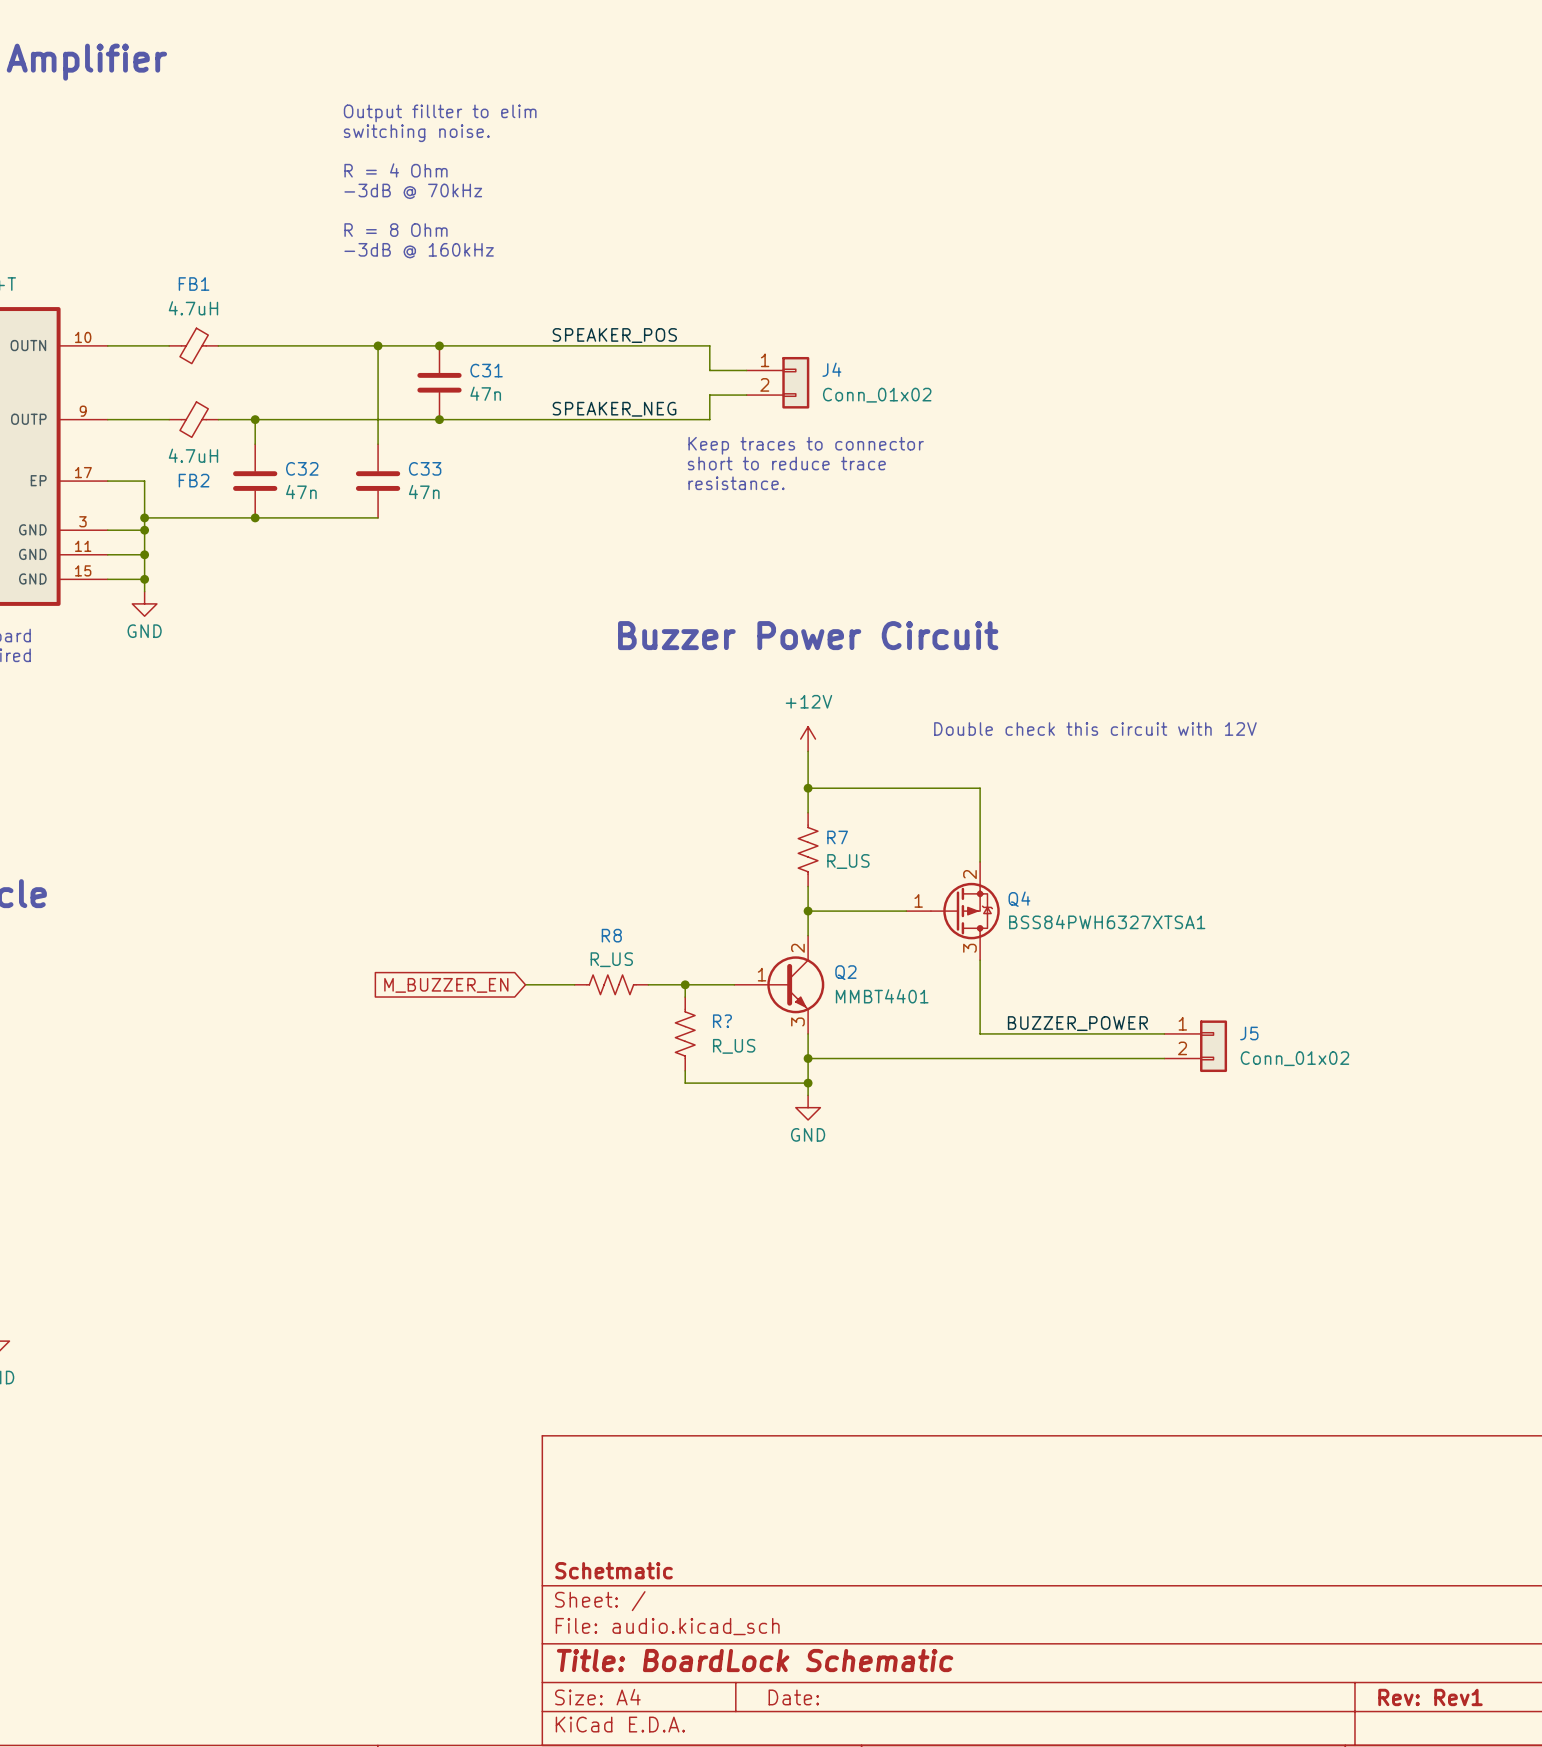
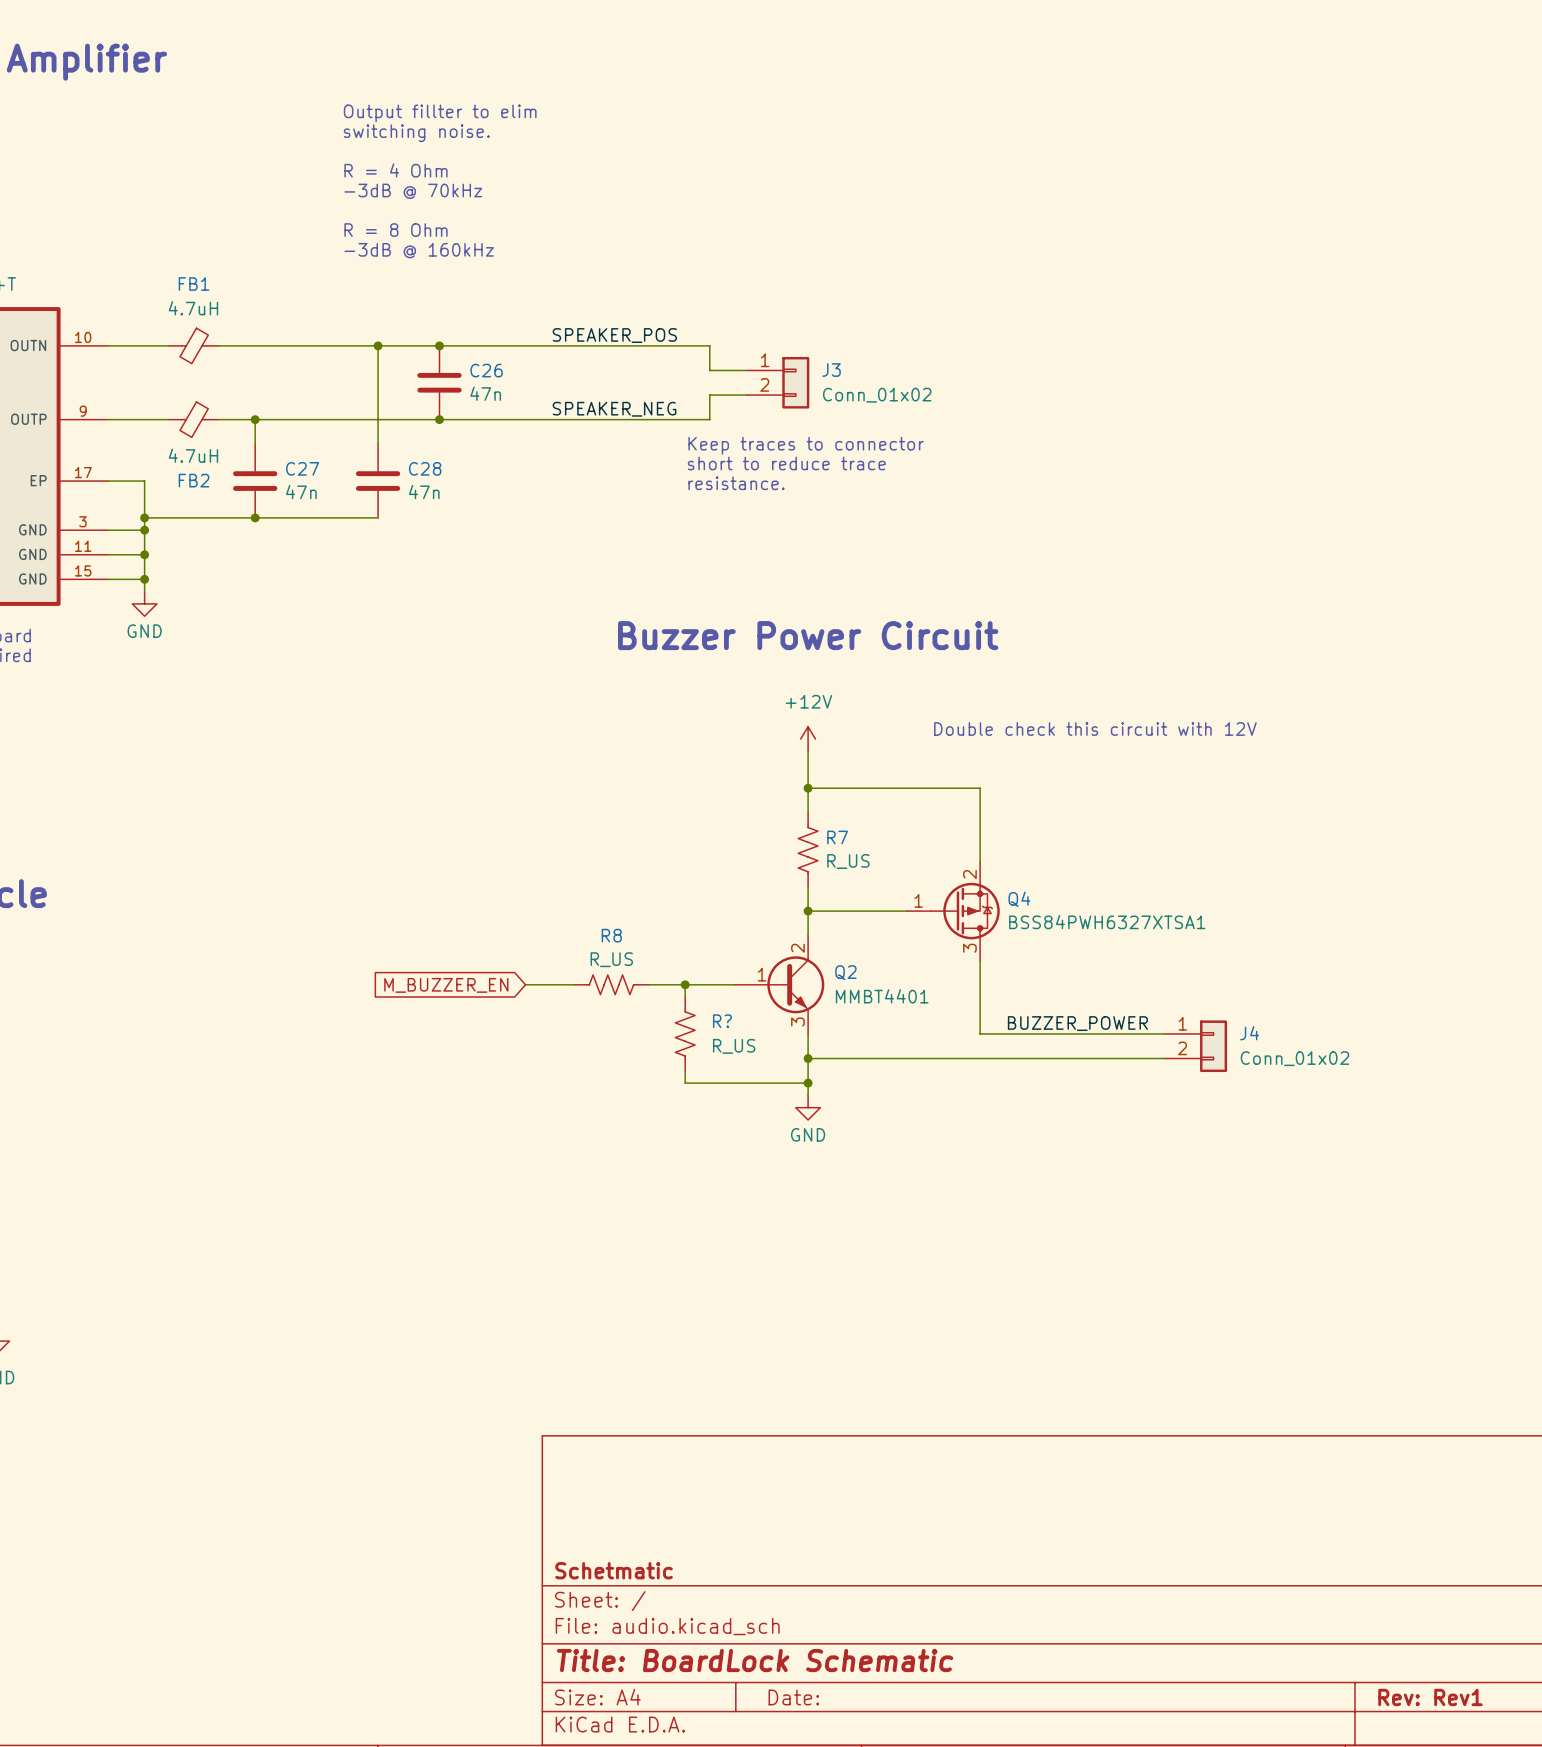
J4 name: J4 (831, 369) -> J3 (831, 370)
C31 name: C31 (486, 370) -> C26 (486, 370)
C32 name: C32 (302, 468) -> C27 (302, 468)
C33 name: C33 (425, 468) -> C28 (425, 468)
J5 name: J5 (1249, 1033) -> J4 (1249, 1033)

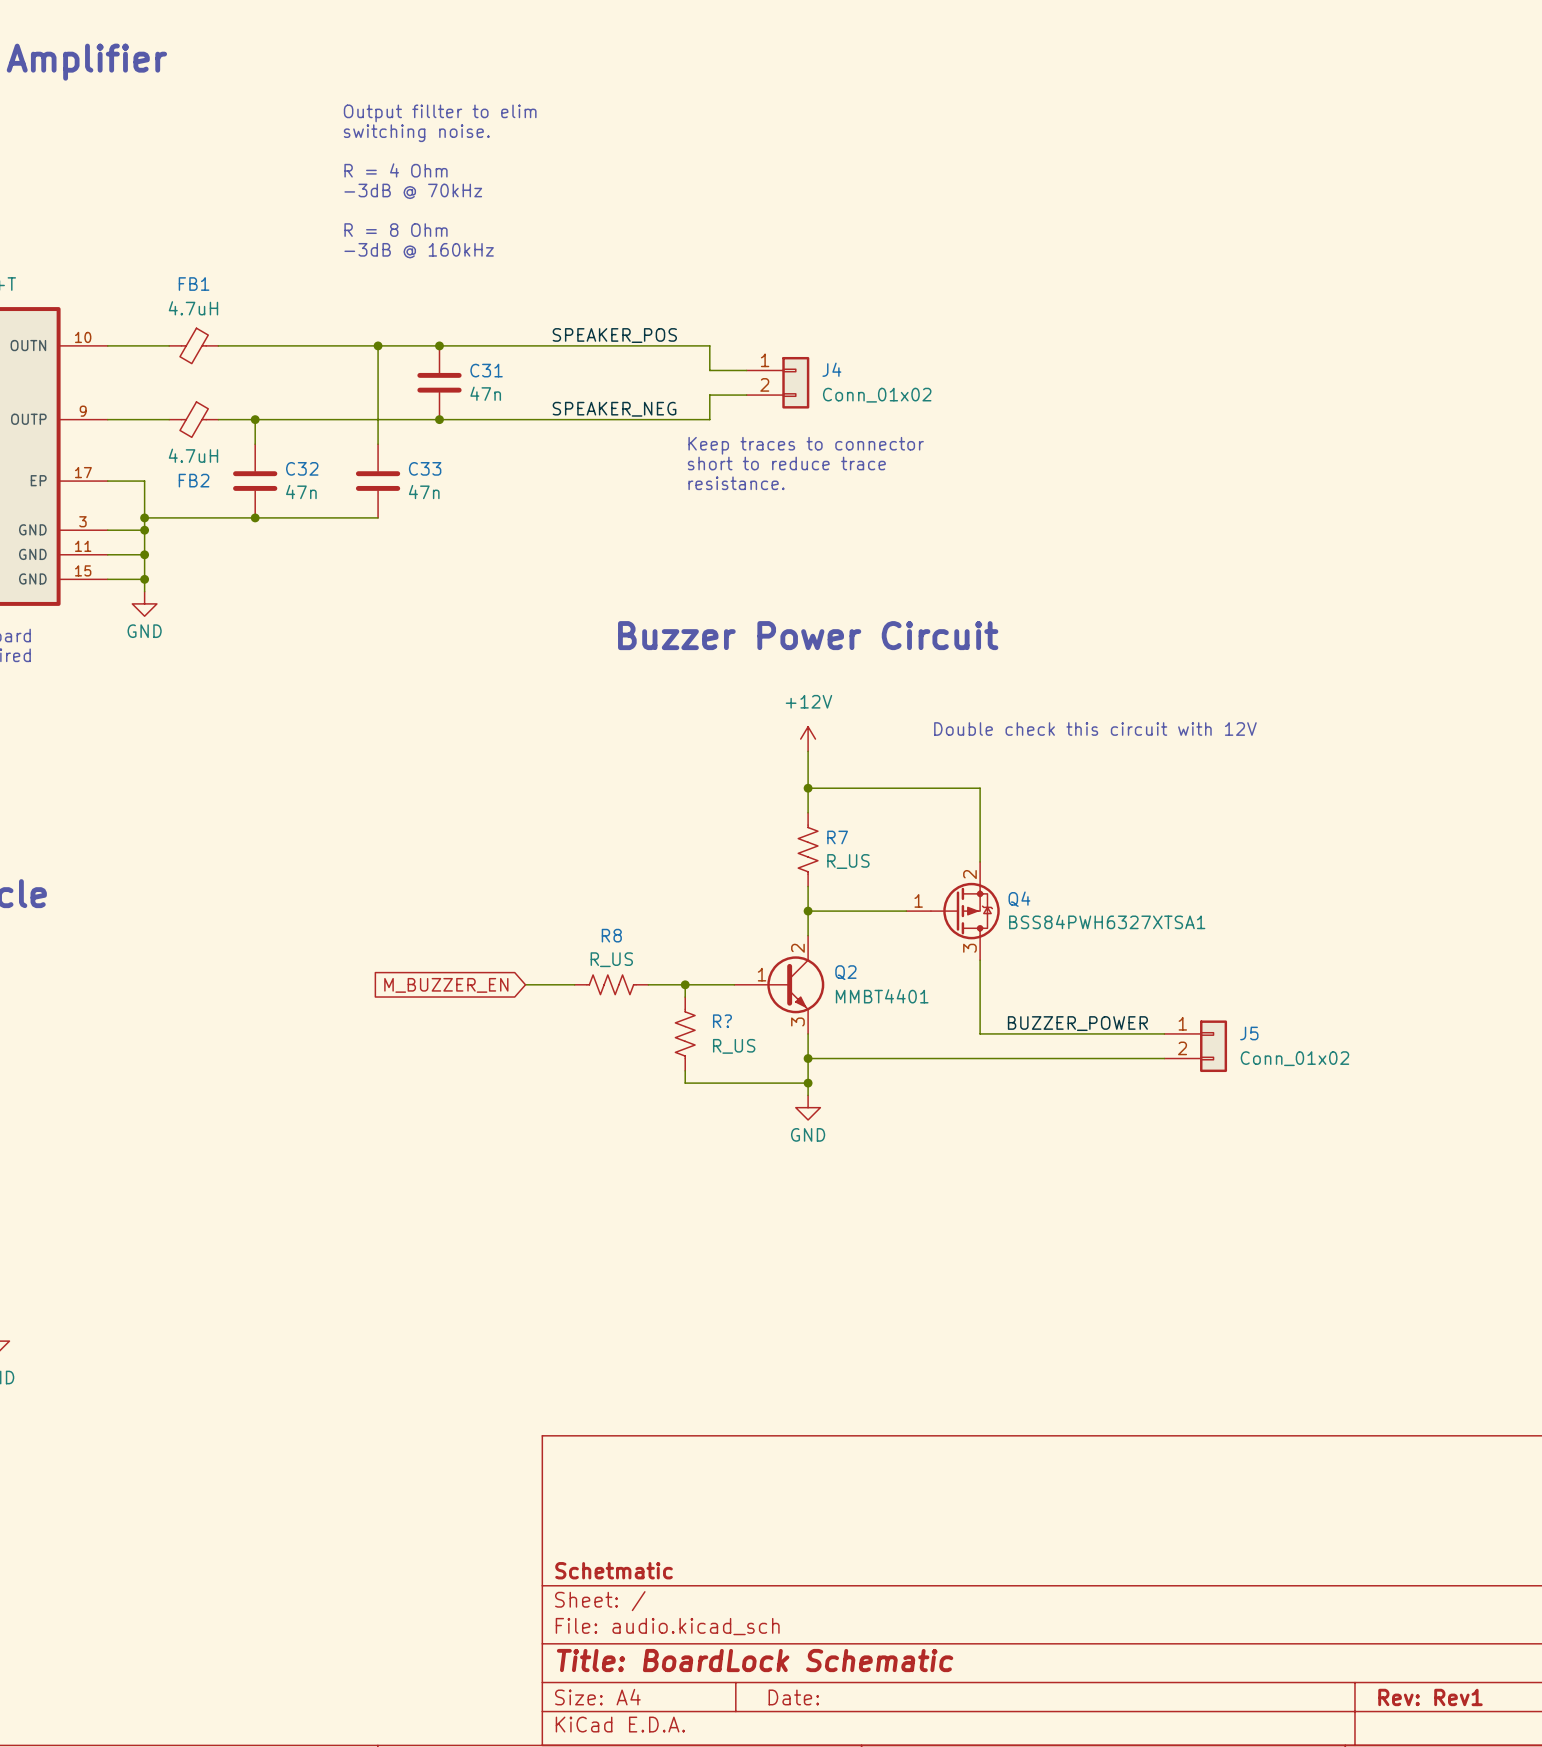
C26 name: C26 (486, 370) -> C31 (486, 370)
J3 name: J3 (831, 370) -> J4 (831, 369)
C27 name: C27 (302, 468) -> C32 (302, 468)
C28 name: C28 (425, 468) -> C33 (425, 468)
J4 name: J4 (1249, 1033) -> J5 (1249, 1033)

